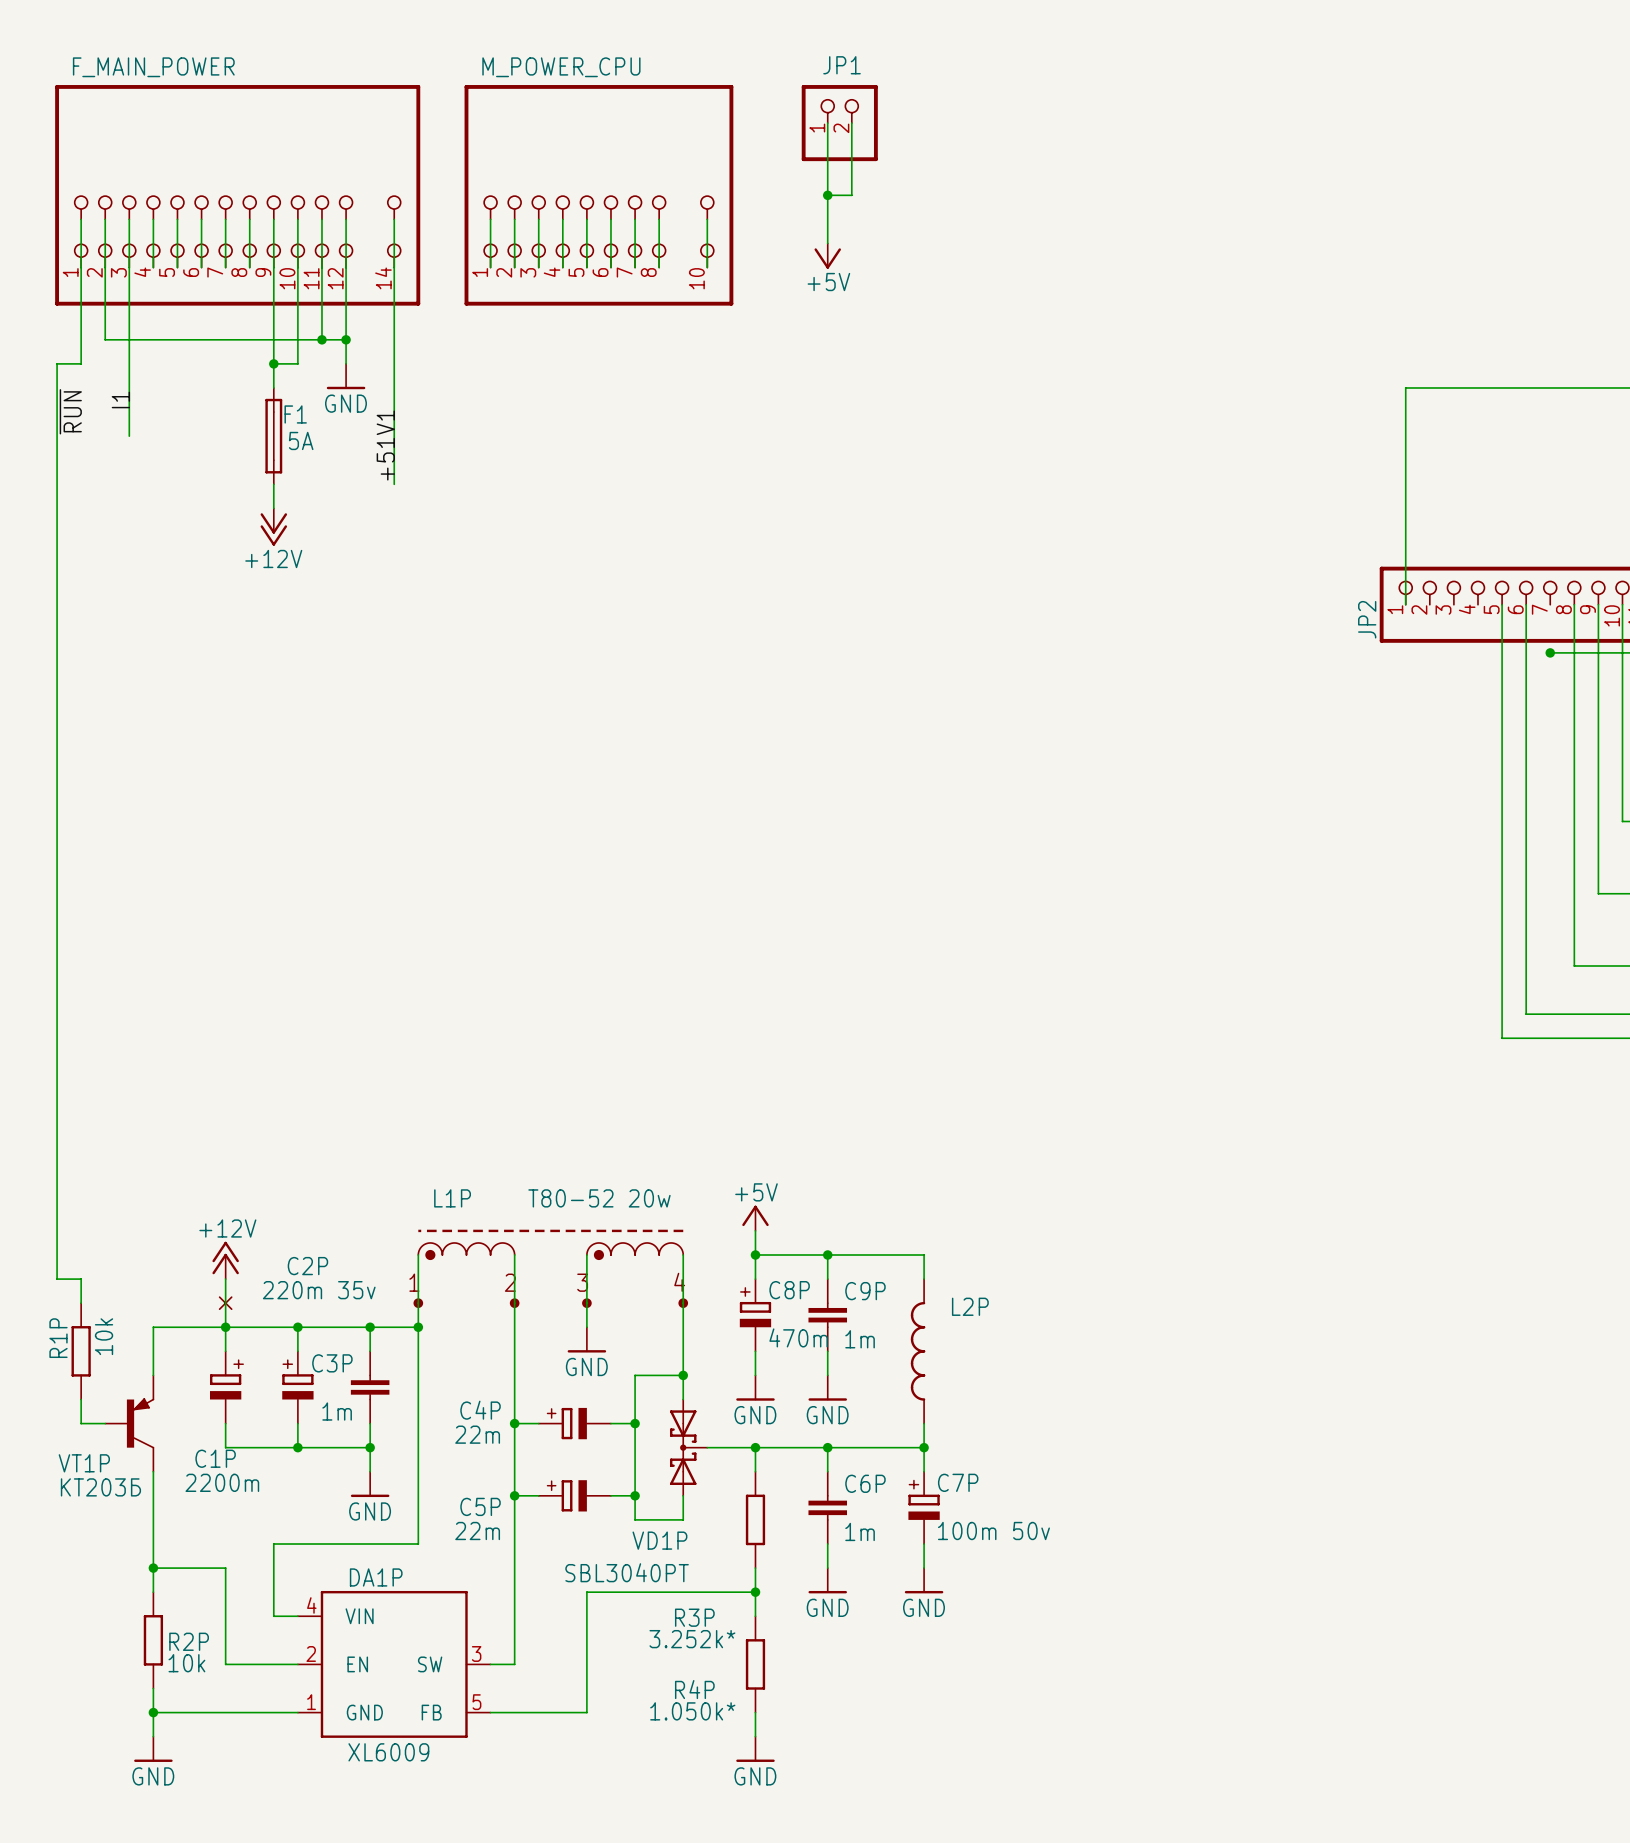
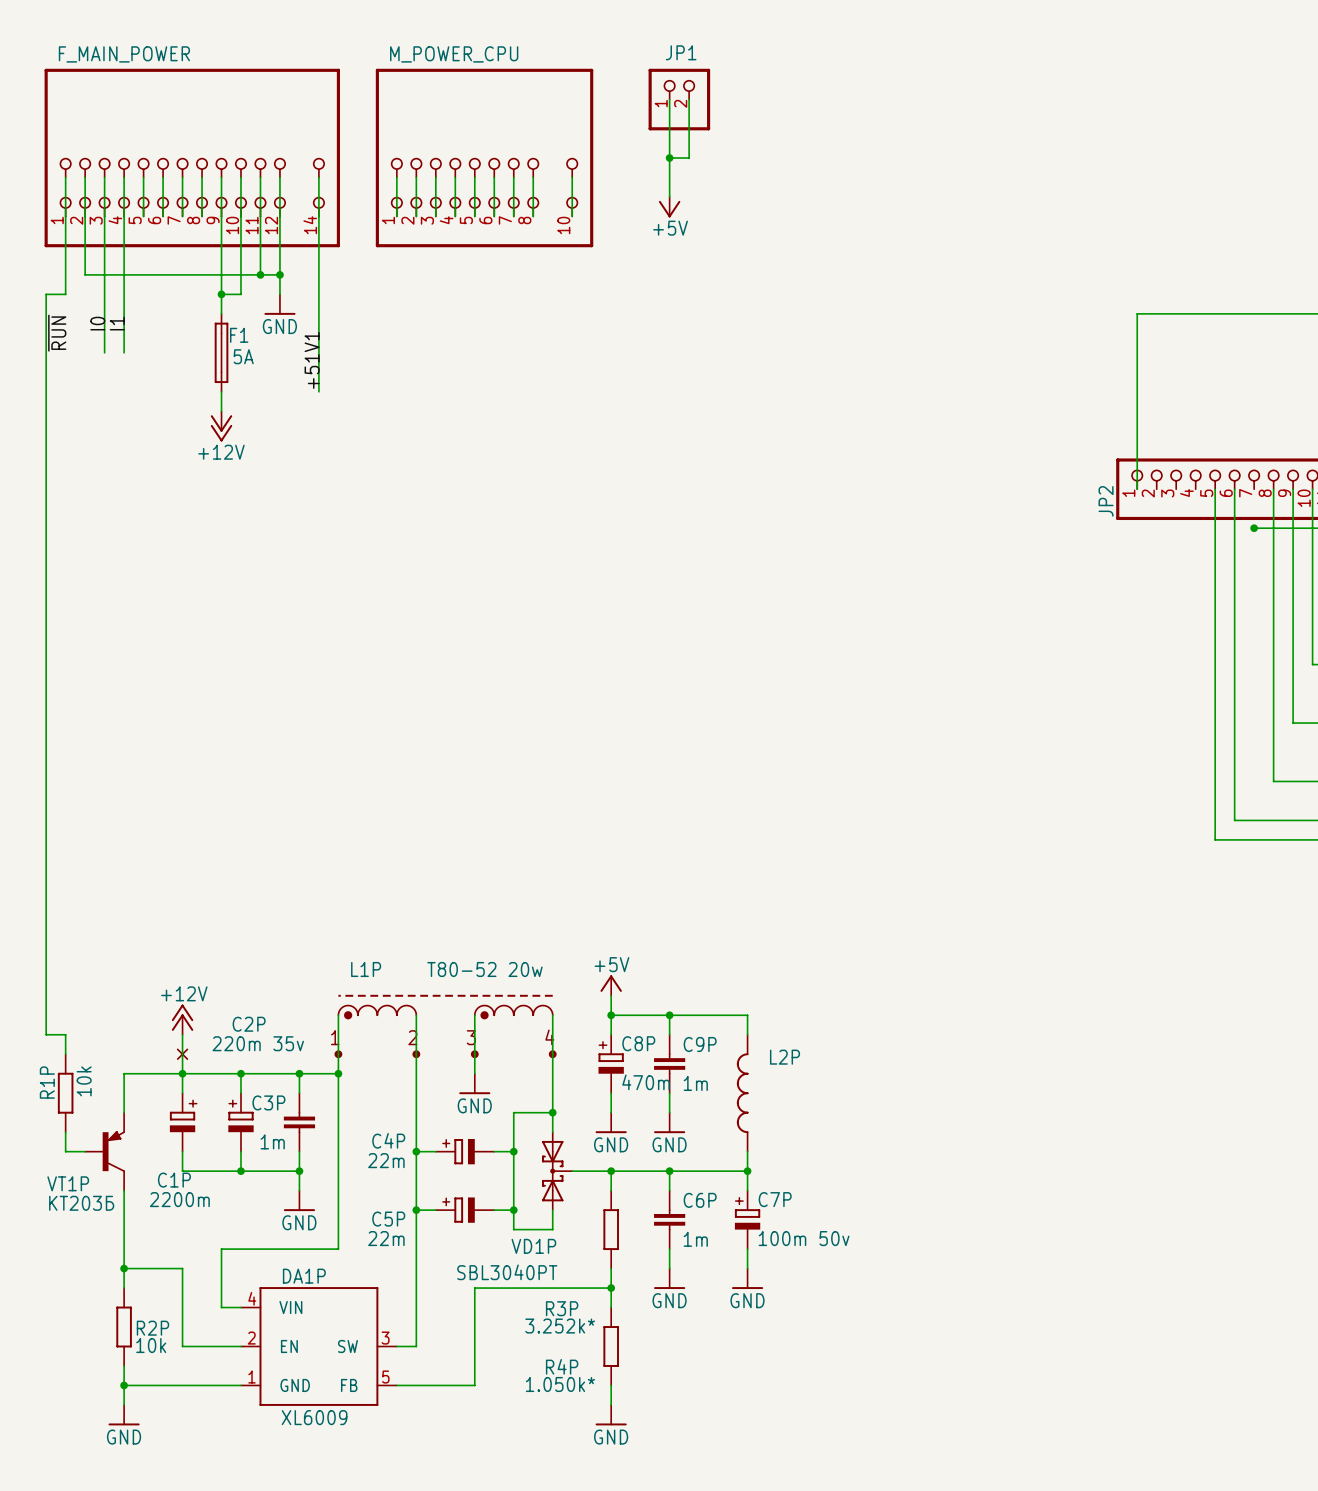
wire: none -> (124, 216) (124, 352)
label: I1 (120, 399) -> I0 (97, 323)
label: none -> I1 (117, 323)

